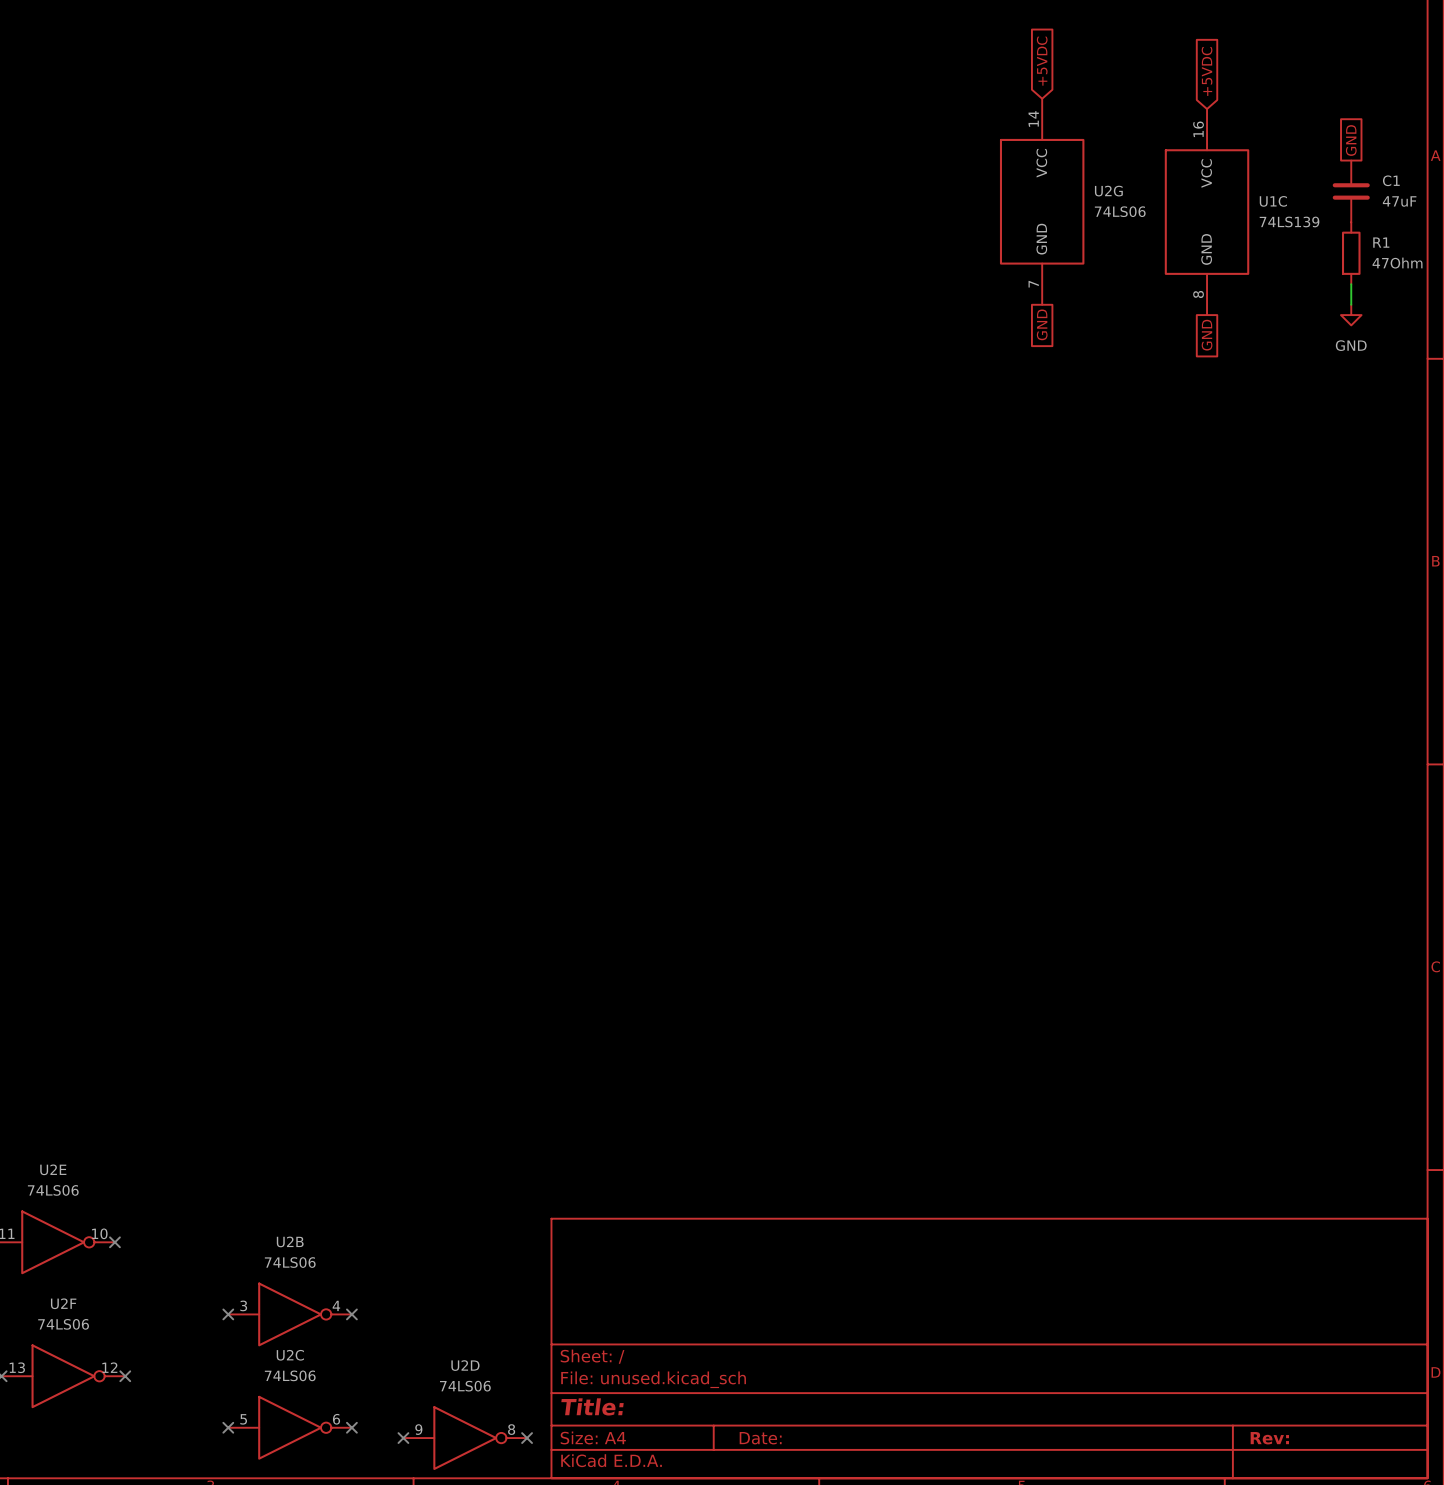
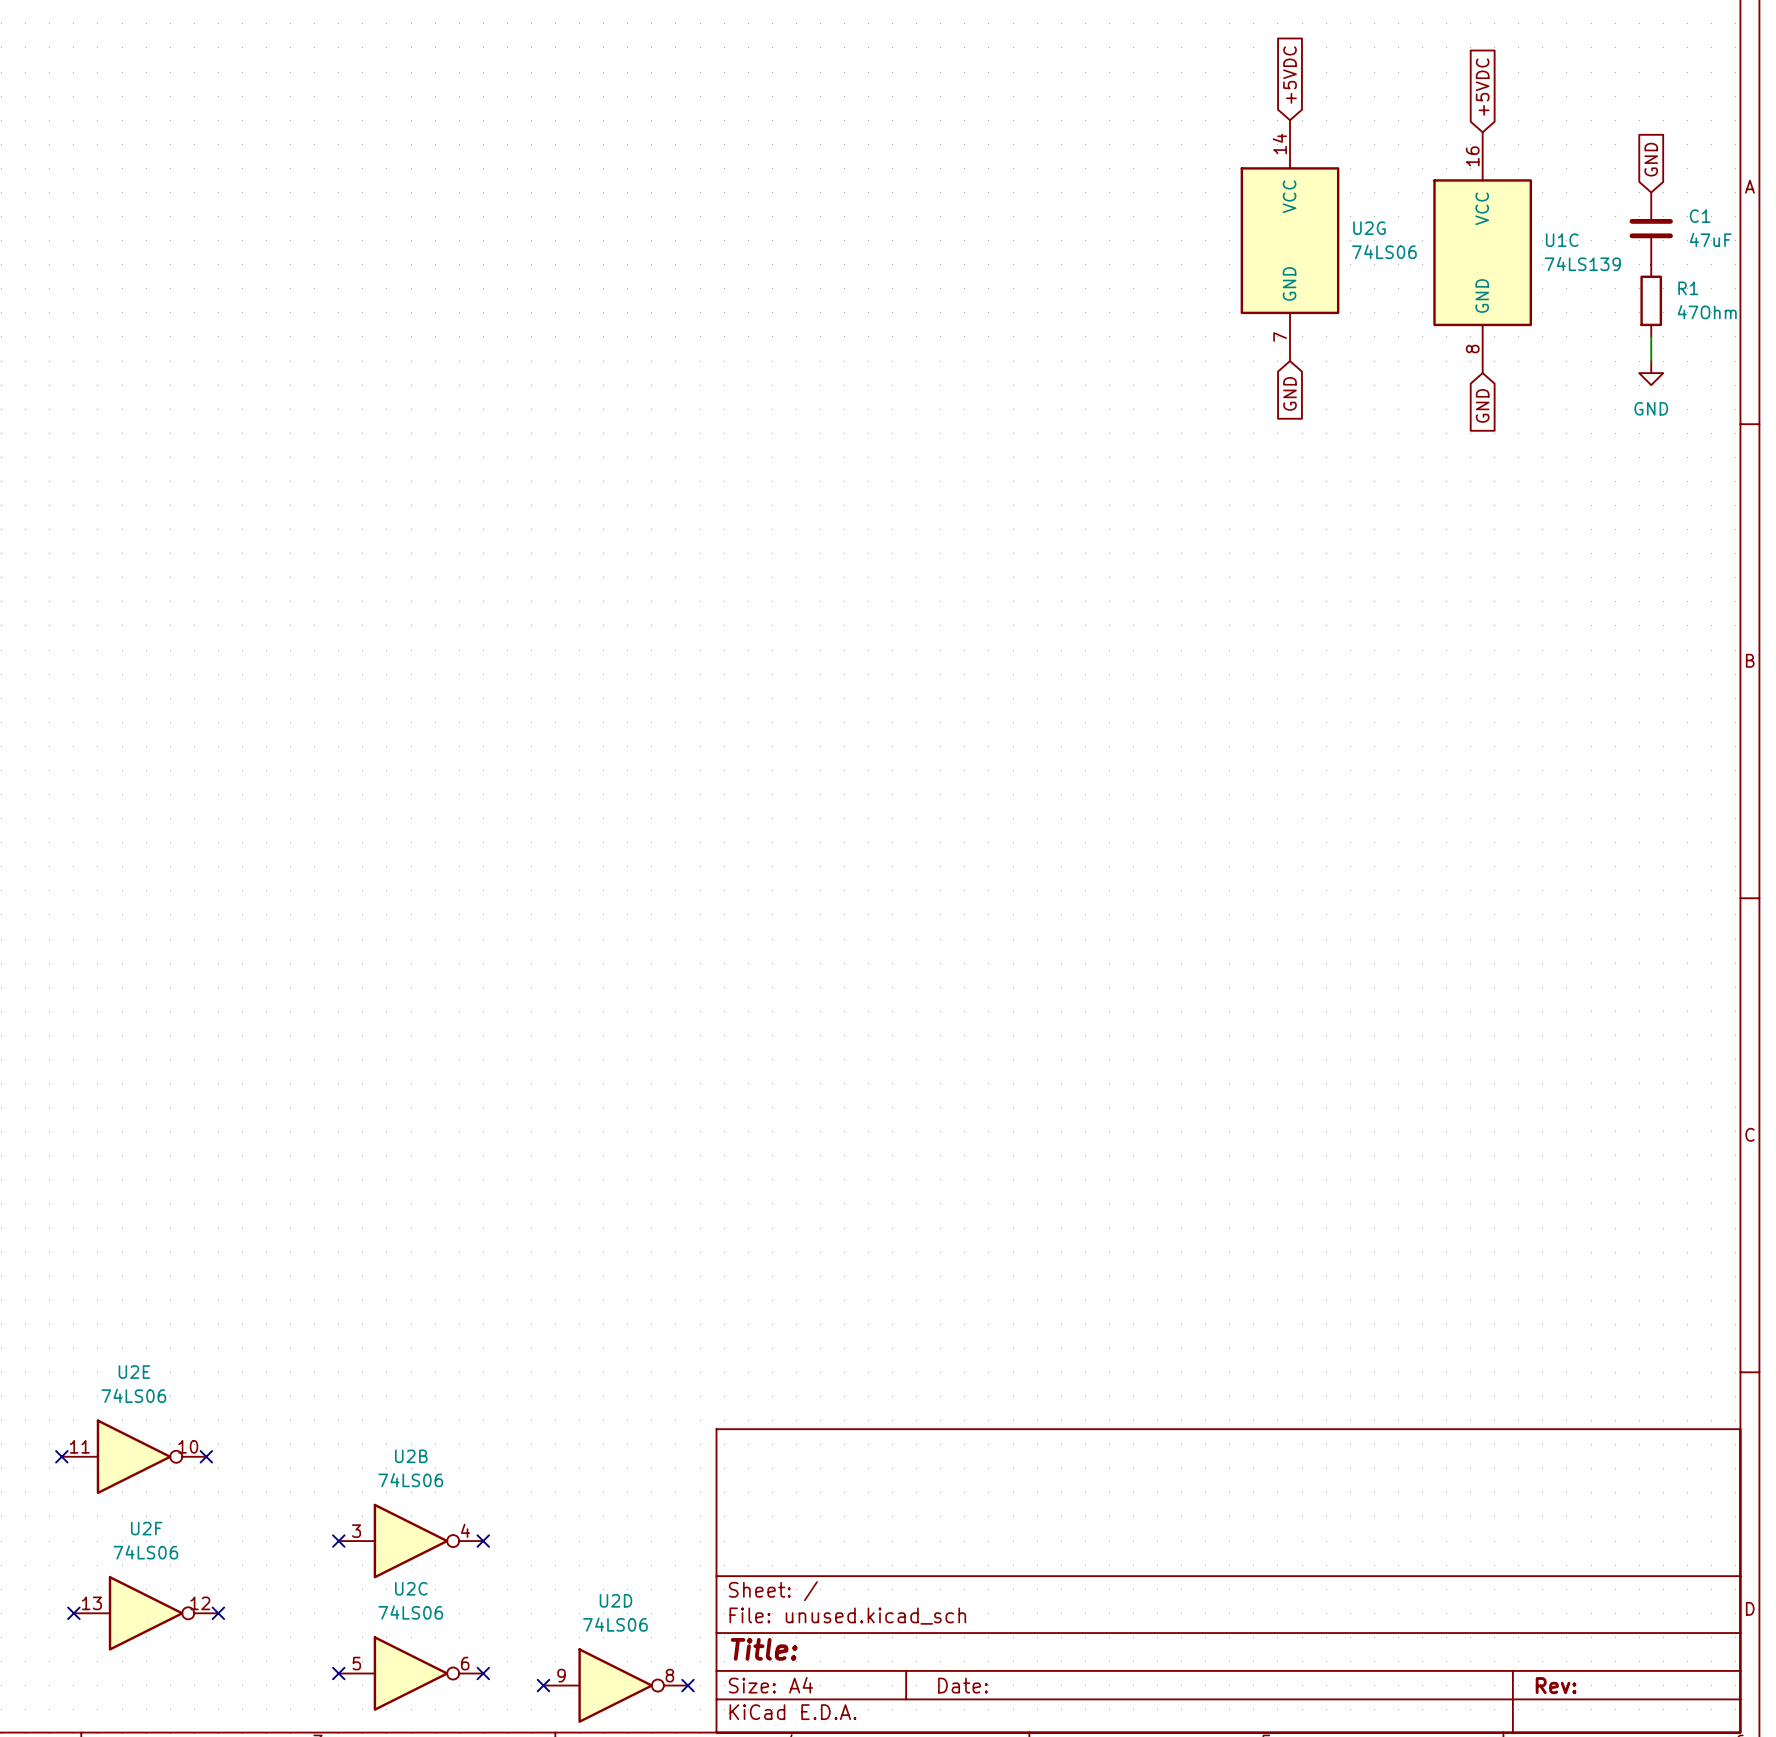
global label shape: passive (1351, 140) -> input (1651, 159)
global label shape: passive (1042, 324) -> input (1290, 393)
global label shape: passive (1207, 335) -> input (1482, 405)

